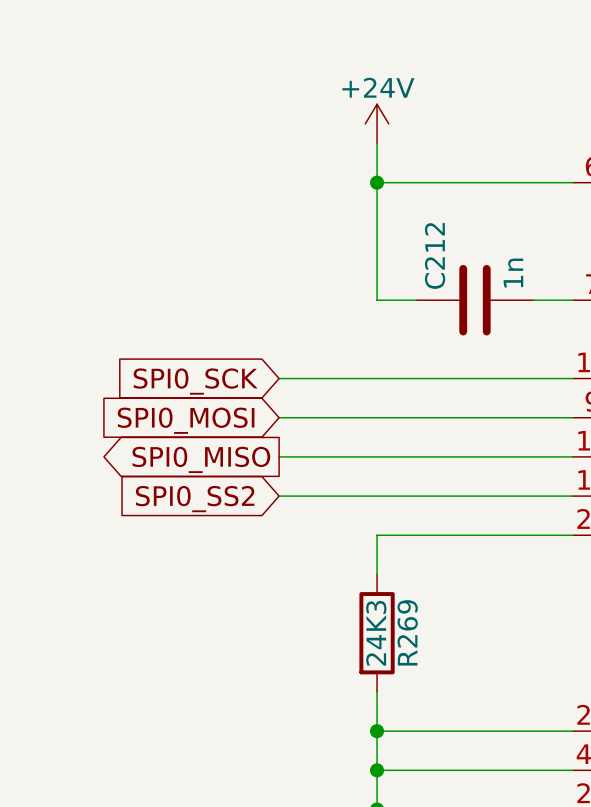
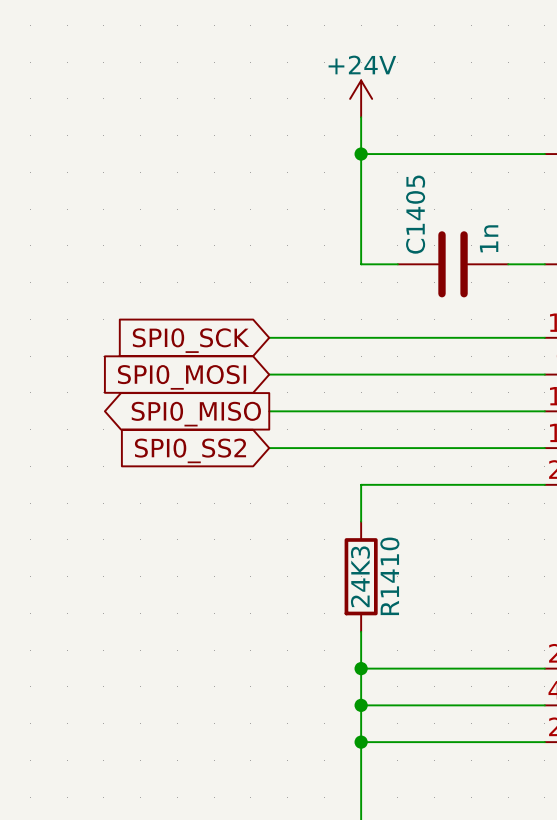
C212 name: C212 (435, 255) -> C1405 (415, 214)
R269 name: R269 (407, 632) -> R1410 (389, 576)

